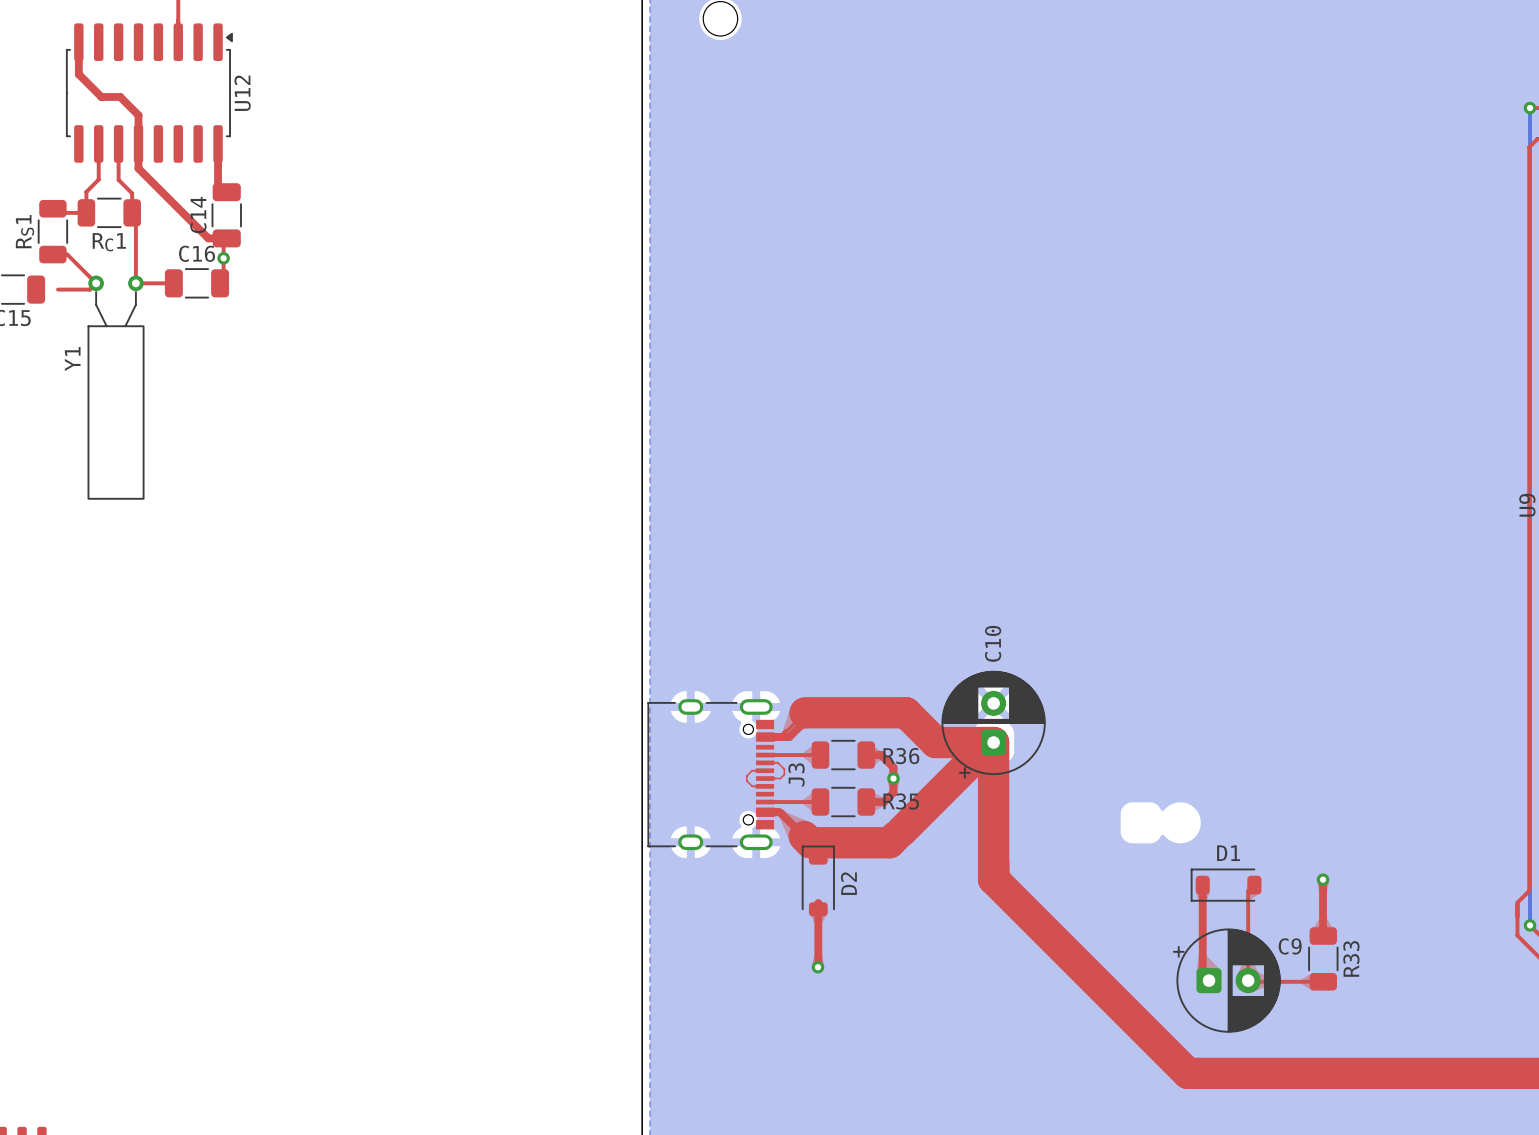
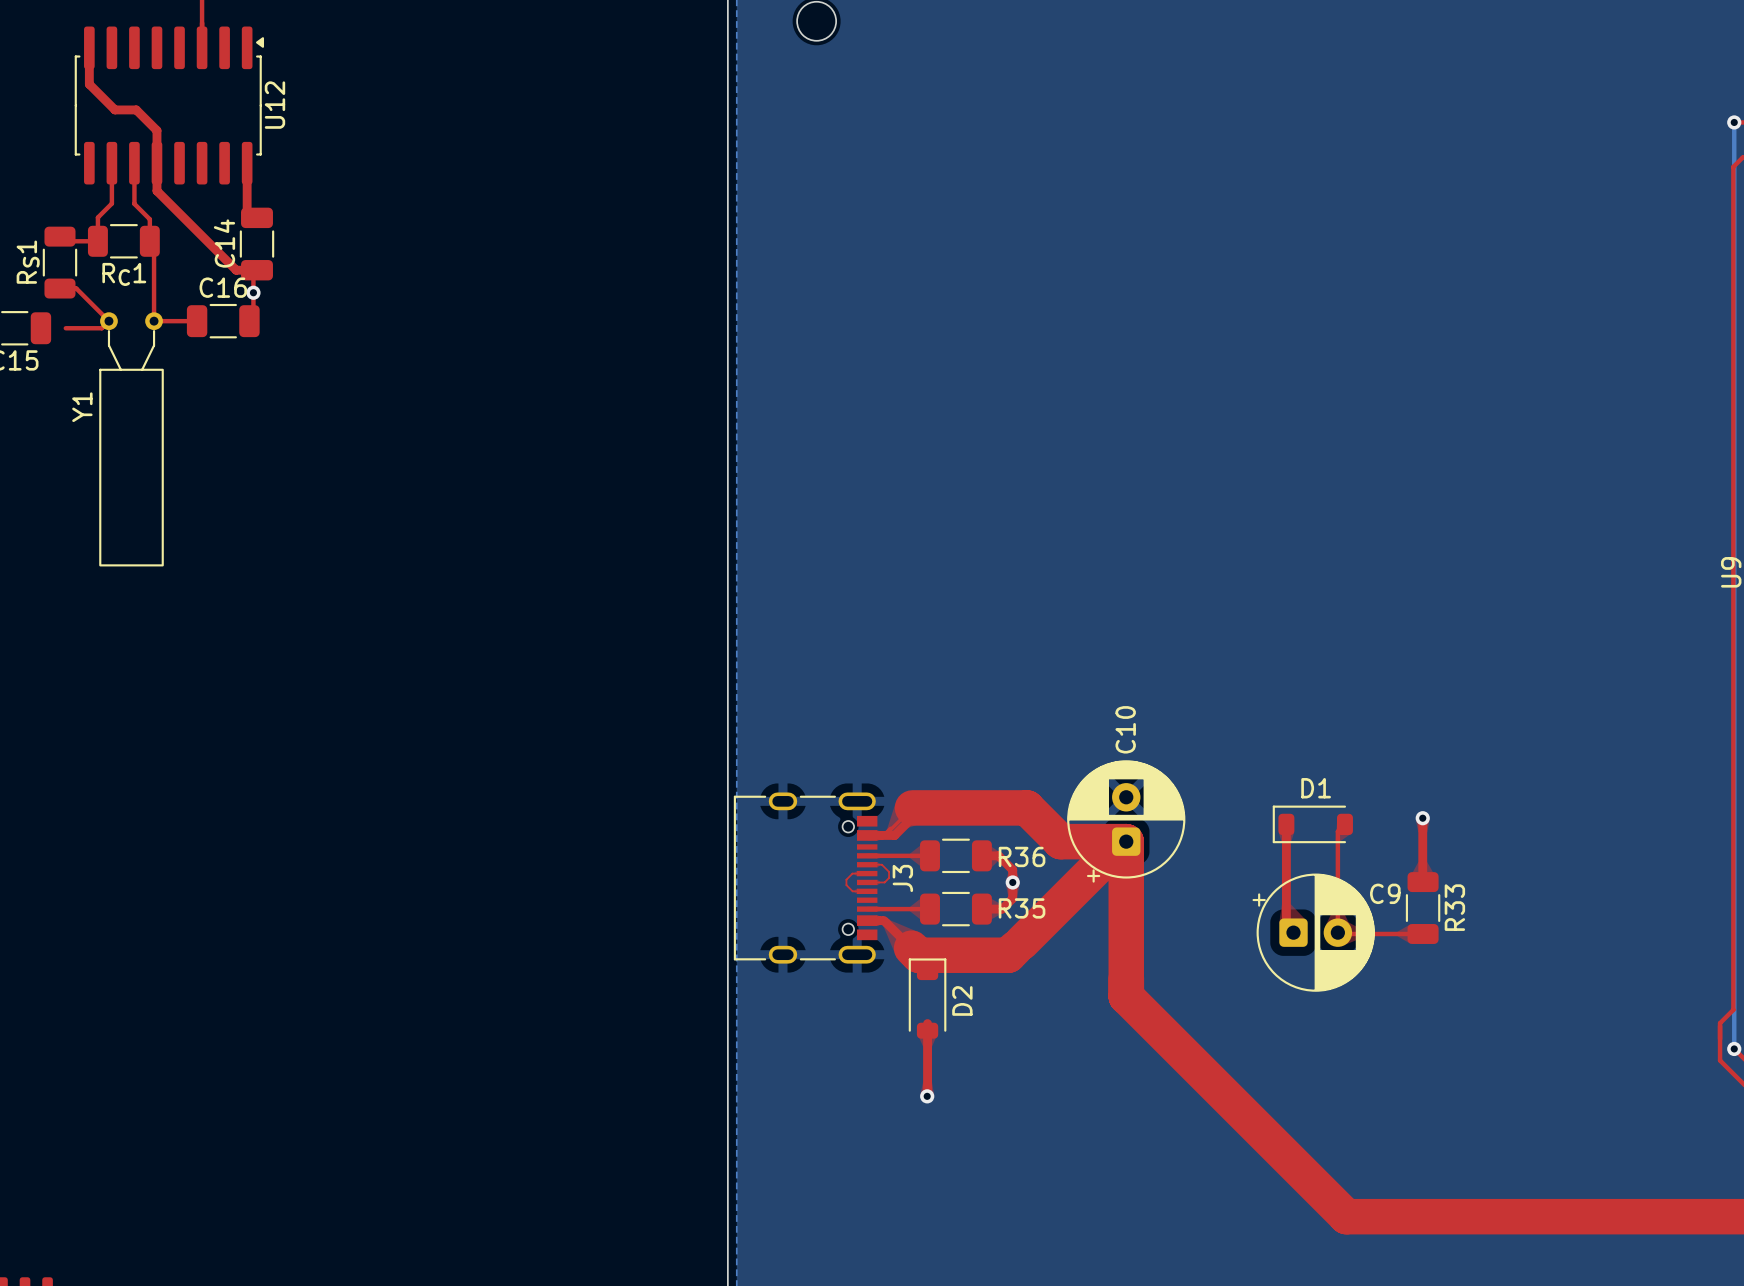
via: none -> (1422, 818)
top track: (1323, 879) (1323, 935) -> (1422, 818) (1423, 882)
via: (1323, 879) -> none
top track: (1202, 885) (1202, 974) (1209, 980) -> (1286, 824) (1286, 925) (1293, 932)
D1 position: (1226, 885) -> (1312, 824)
top track: (1254, 885) (1248, 891) (1248, 980) (1323, 981) -> (1344, 824) (1337, 831) (1337, 932) (1423, 933)
R33 position: (1323, 958) -> (1423, 908)
C9 position: (1226, 980) -> (1313, 932)

